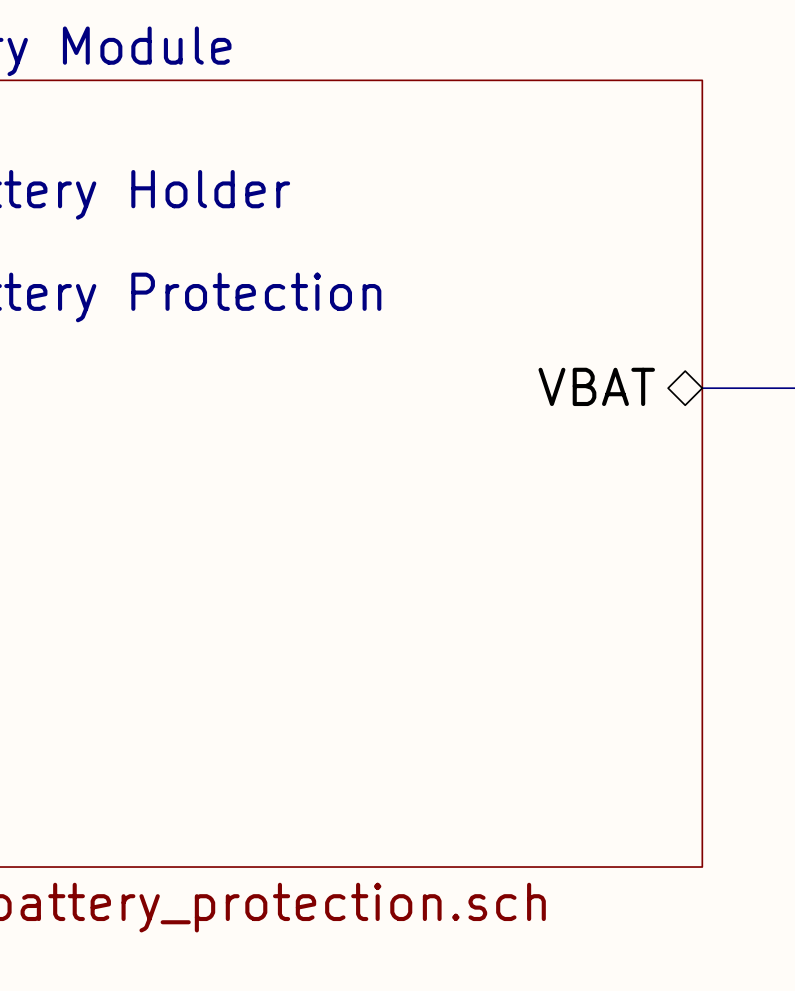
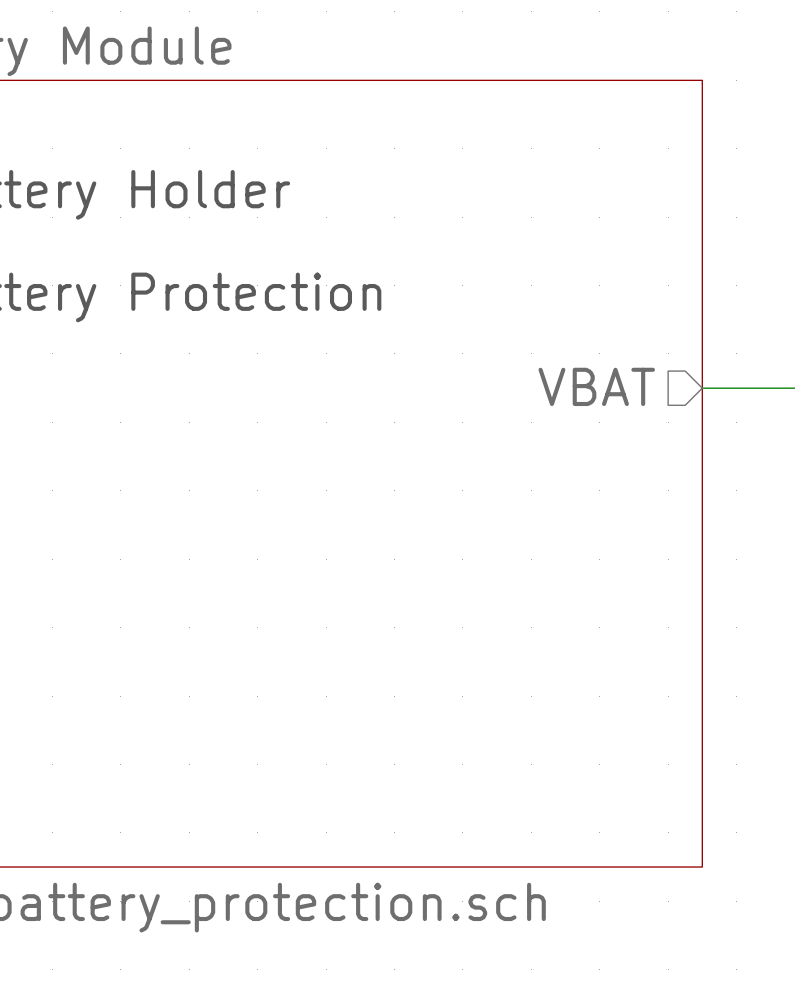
sheet pin shape: bidirectional (596, 386) -> output (596, 386)

